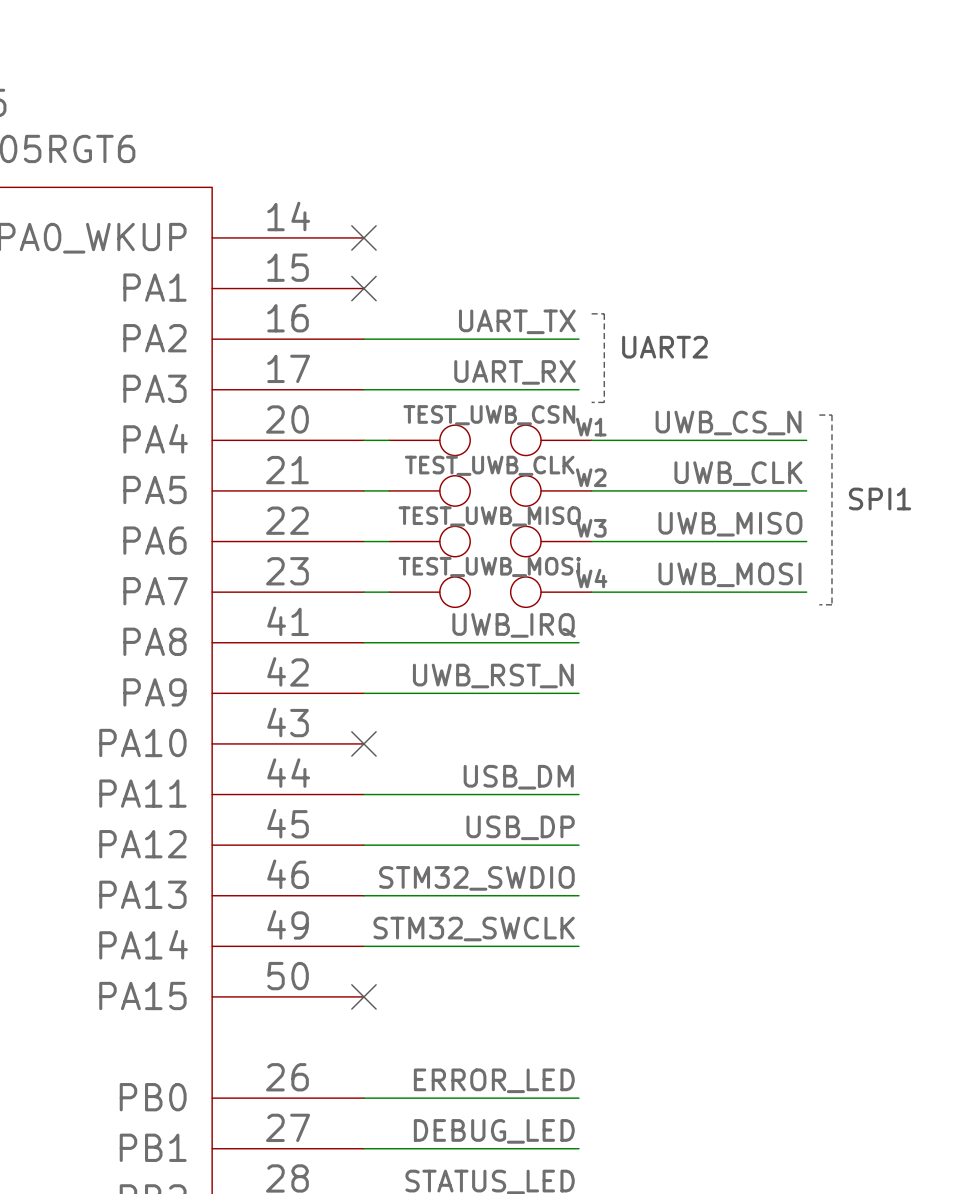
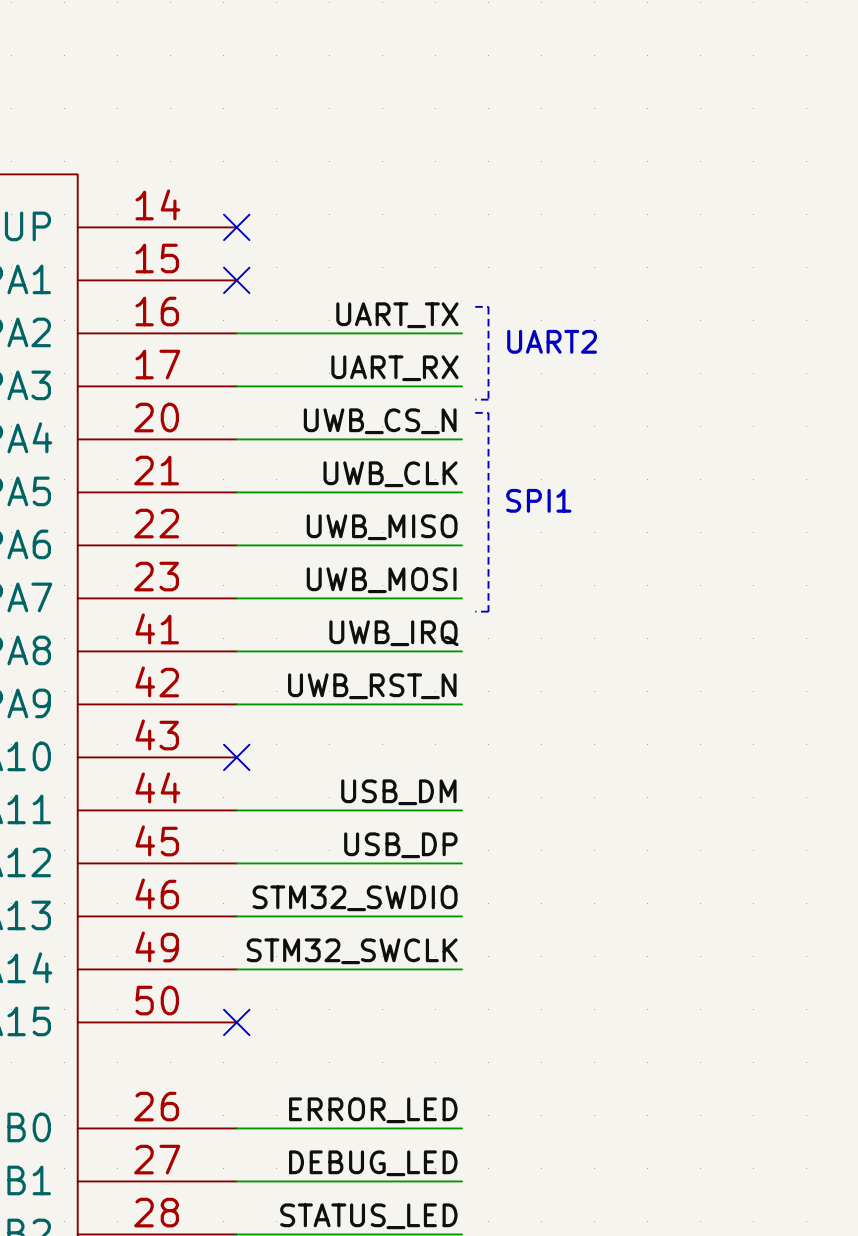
line: (819, 415) (831, 415) (831, 604) (819, 604) -> (475, 412) (488, 412) (488, 611) (475, 611)
label position: UWB_CS_N (728, 423) -> UWB_CS_N (380, 421)
wire: none -> (263, 439) (462, 439)
W1: TEST_UWB_CSN (490, 440) -> none
wire: (591, 440) (806, 440) -> none
label position: UWB_CLK (738, 473) -> UWB_CLK (390, 474)
wire: none -> (263, 492) (462, 492)
W2: TEST_UWB_CLK (490, 490) -> none
wire: (591, 490) (806, 490) -> none
text position: SPI1 (879, 498) -> SPI1 (538, 500)
label position: UWB_MISO (730, 524) -> UWB_MISO (382, 527)
wire: none -> (263, 545) (462, 545)
W3: TEST_UWB_MISO (490, 541) -> none
wire: (591, 541) (806, 541) -> none
label position: UWB_MOSI (729, 574) -> UWB_MOSI (381, 580)
wire: none -> (263, 598) (462, 598)
W4: TEST_UWB_MOSi (490, 592) -> none
wire: (591, 592) (806, 592) -> none

